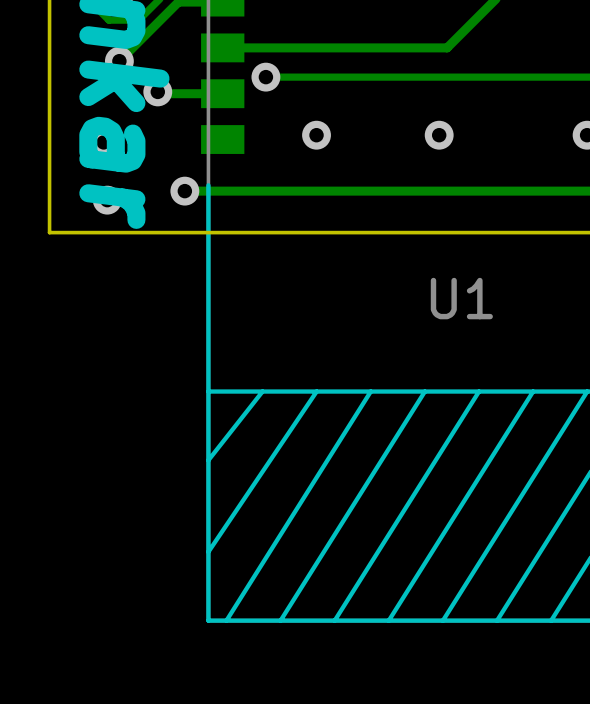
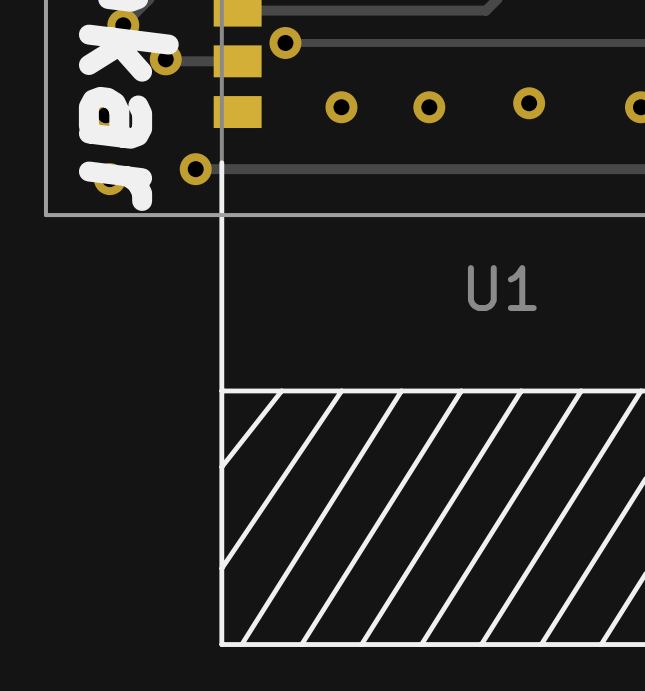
via: none -> (529, 103)
via: none -> (429, 107)
via: (439, 135) -> none

